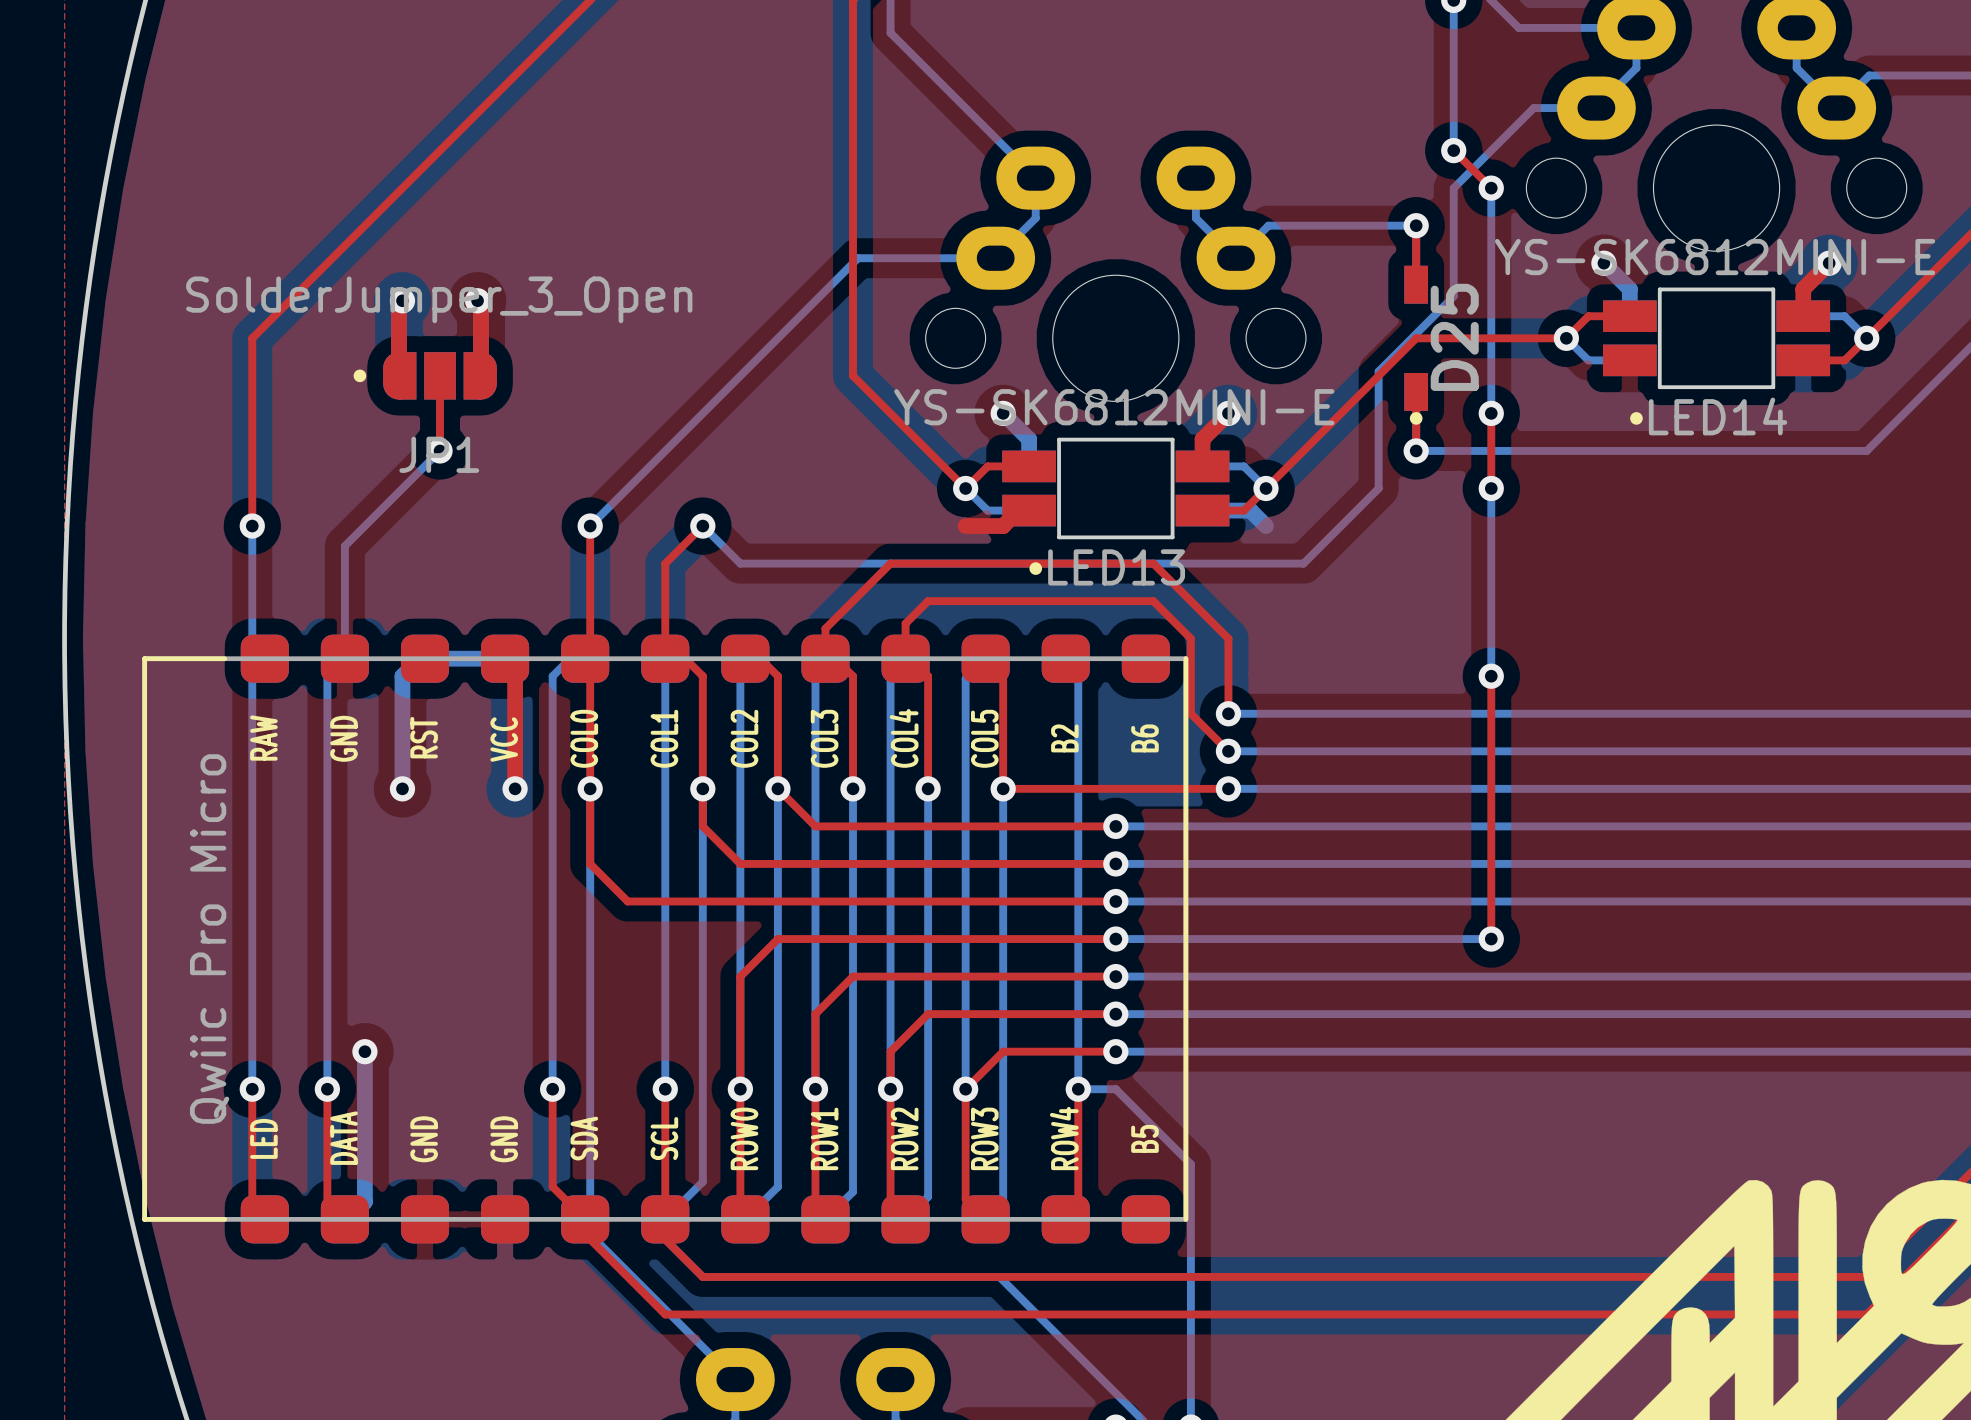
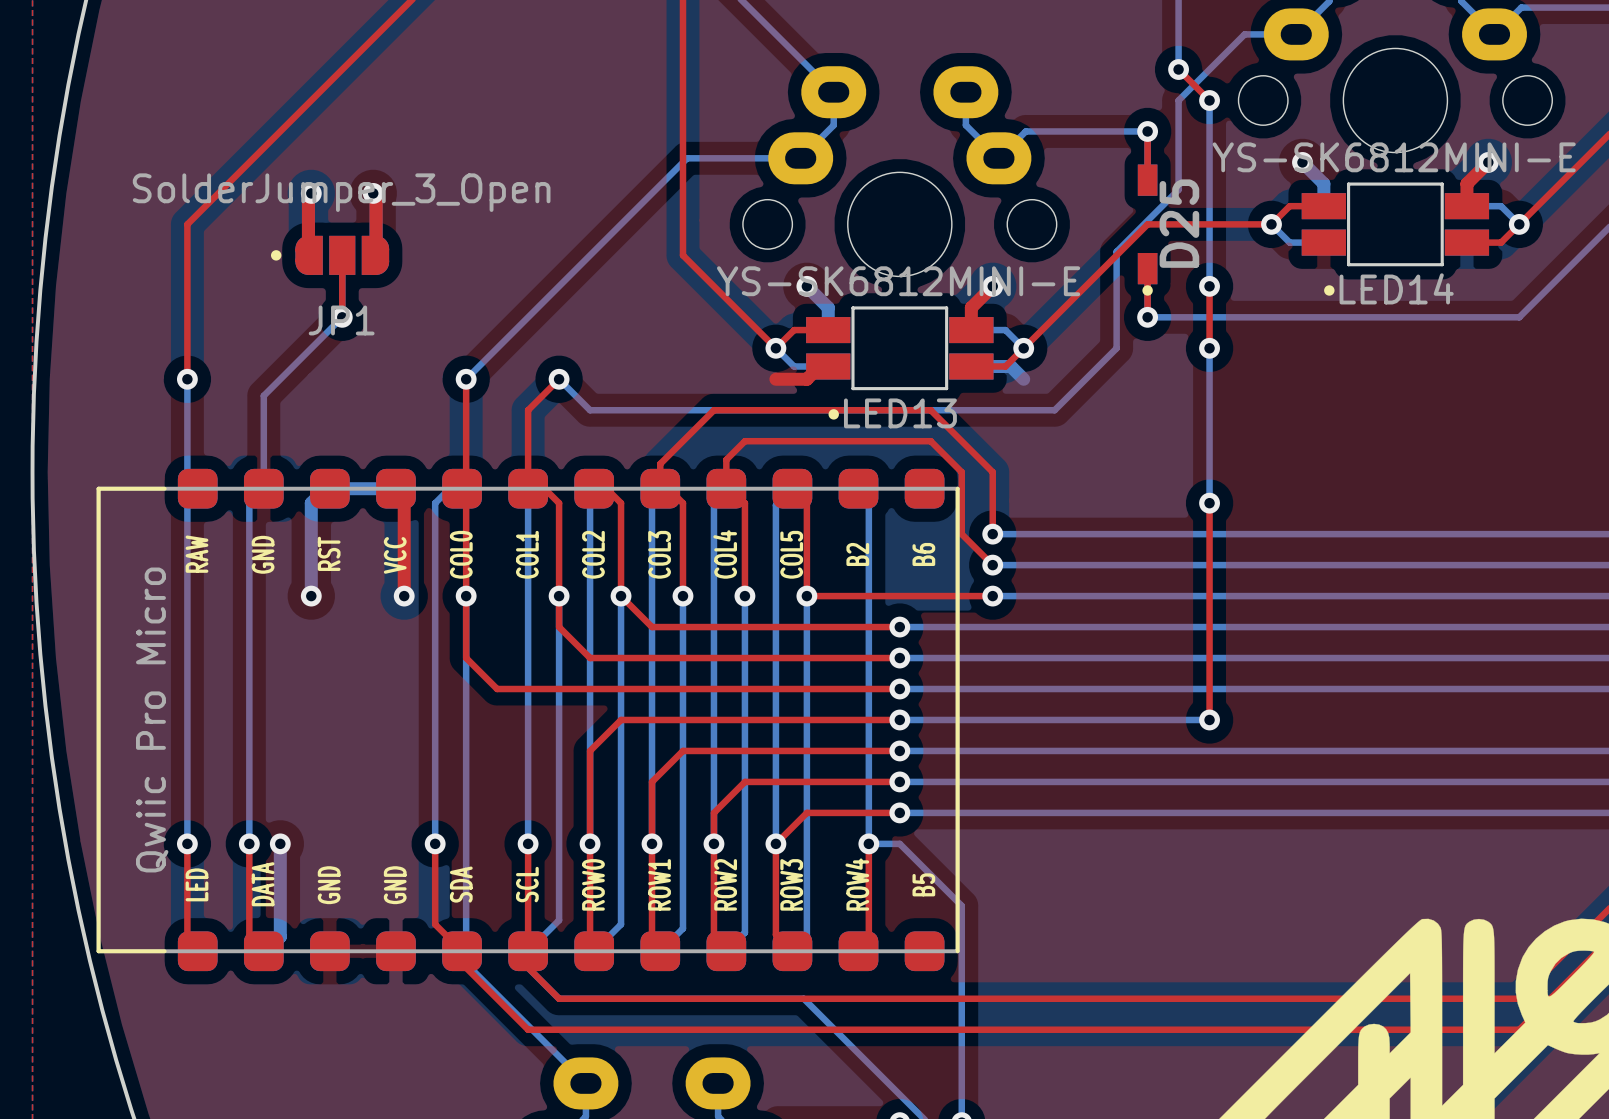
bottom track: (364, 1051) (364, 1089) -> none
via position: (364, 1051) -> (280, 843)

